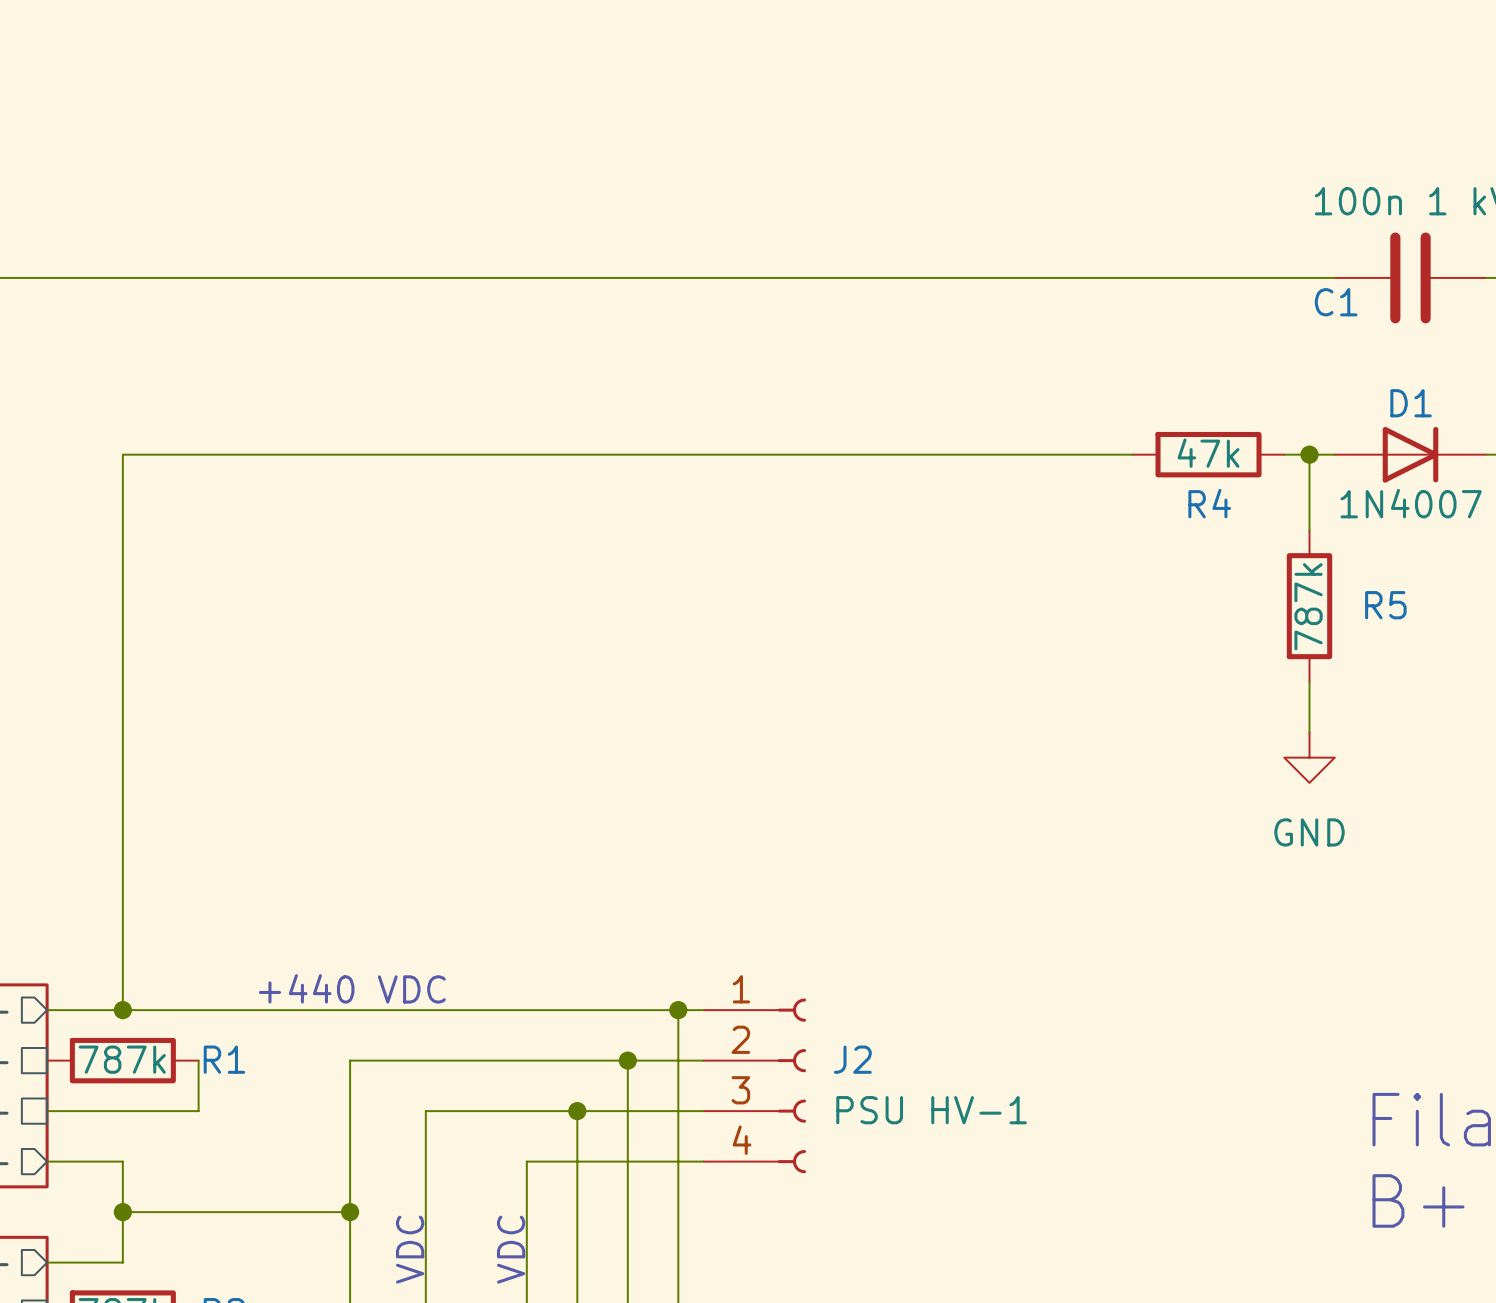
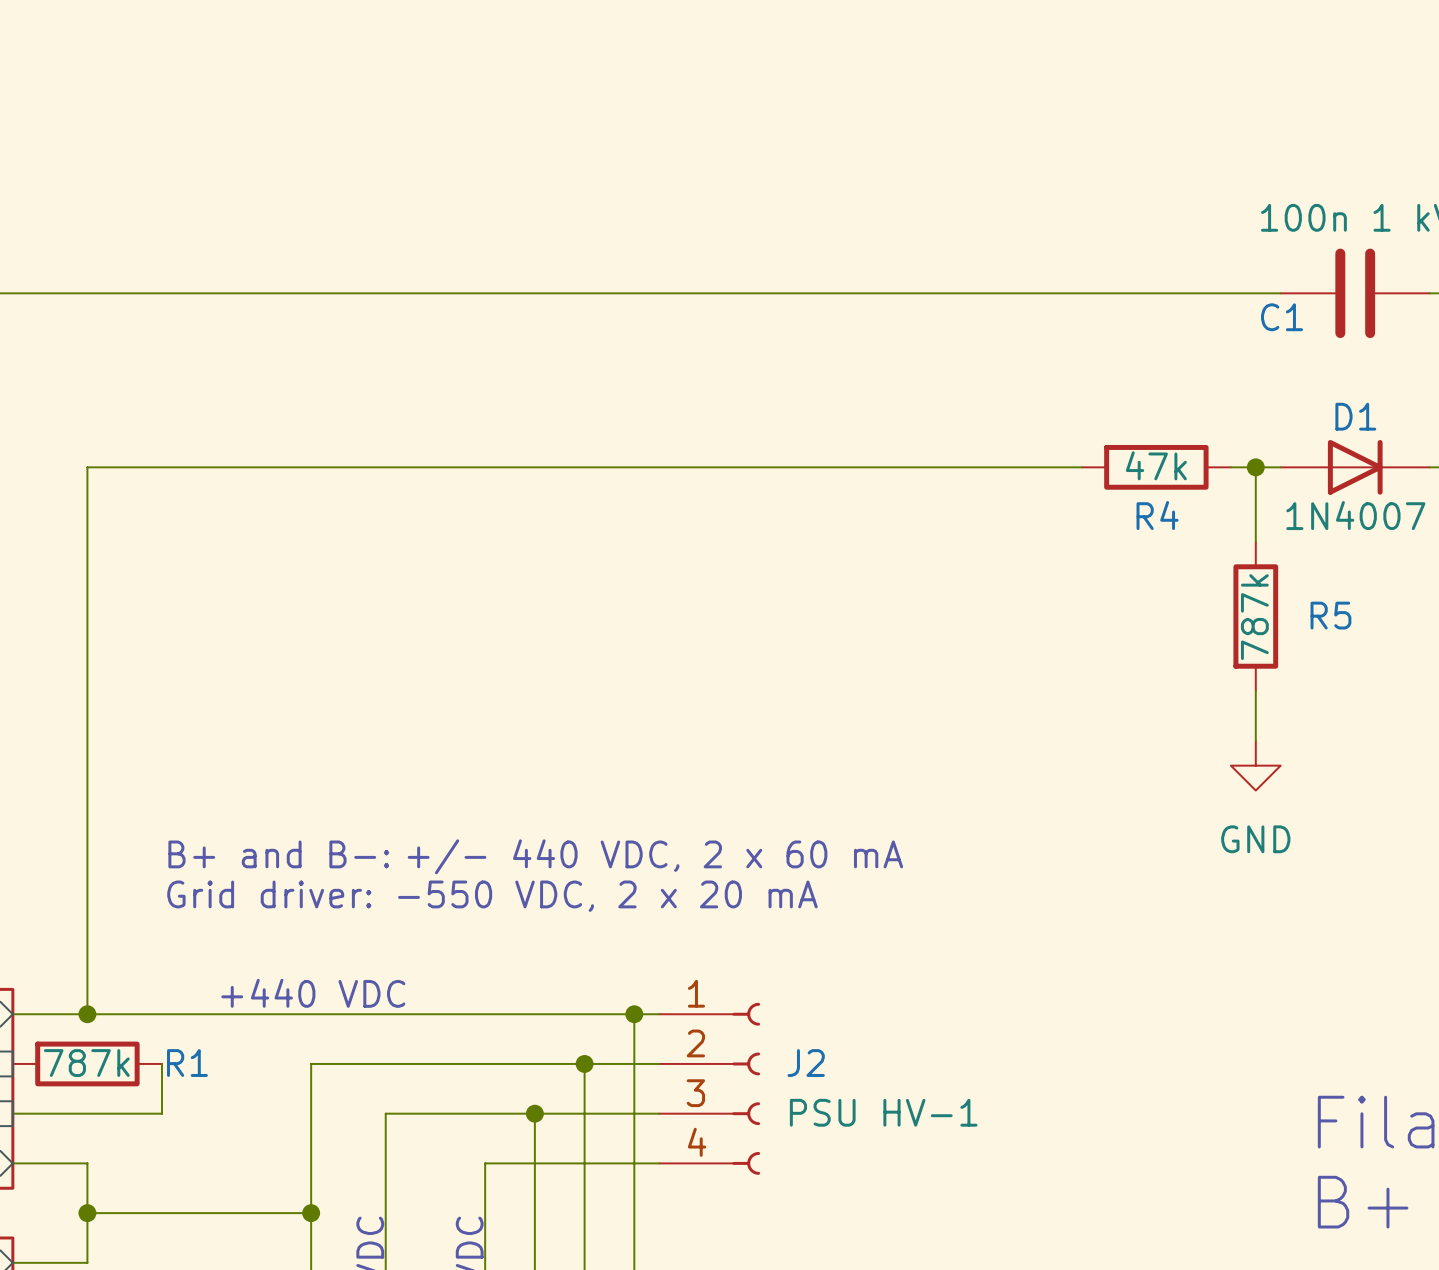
text: none -> B+ and B-: +/- 440 VDC, 2 x 60 mA (535, 856)
text: none -> Grid driver: -550 VDC, 2 x 20 mA (492, 896)

